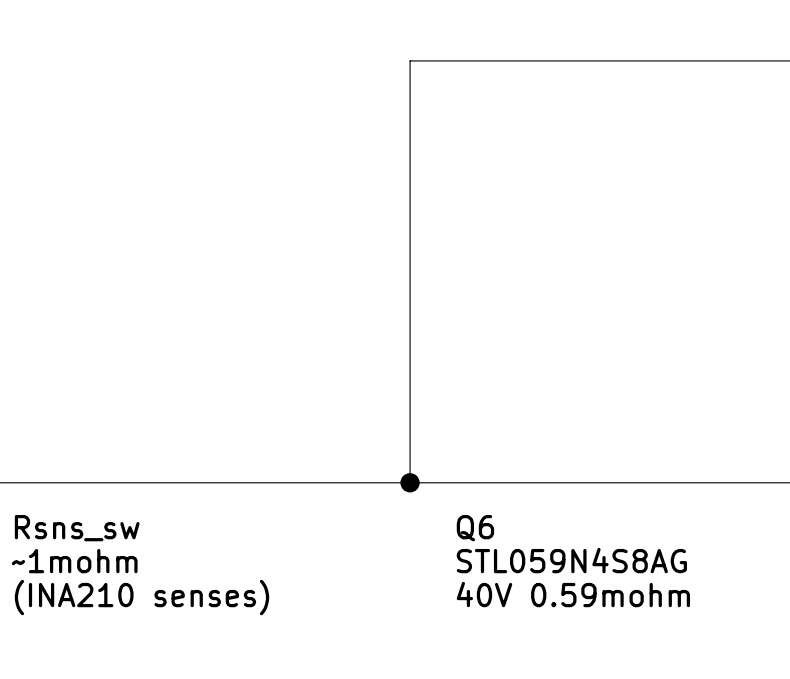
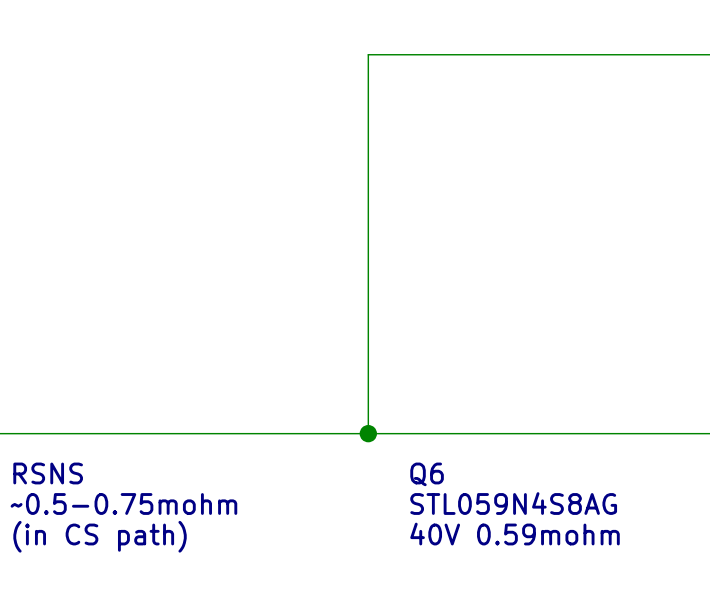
text: Rsns_sw (77, 528) -> RSNS (48, 473)
text: ~1mohm (74, 561) -> ~0.5-0.75mohm (123, 503)
text: (INA210 senses) (141, 597) -> (in CS path) (100, 536)

